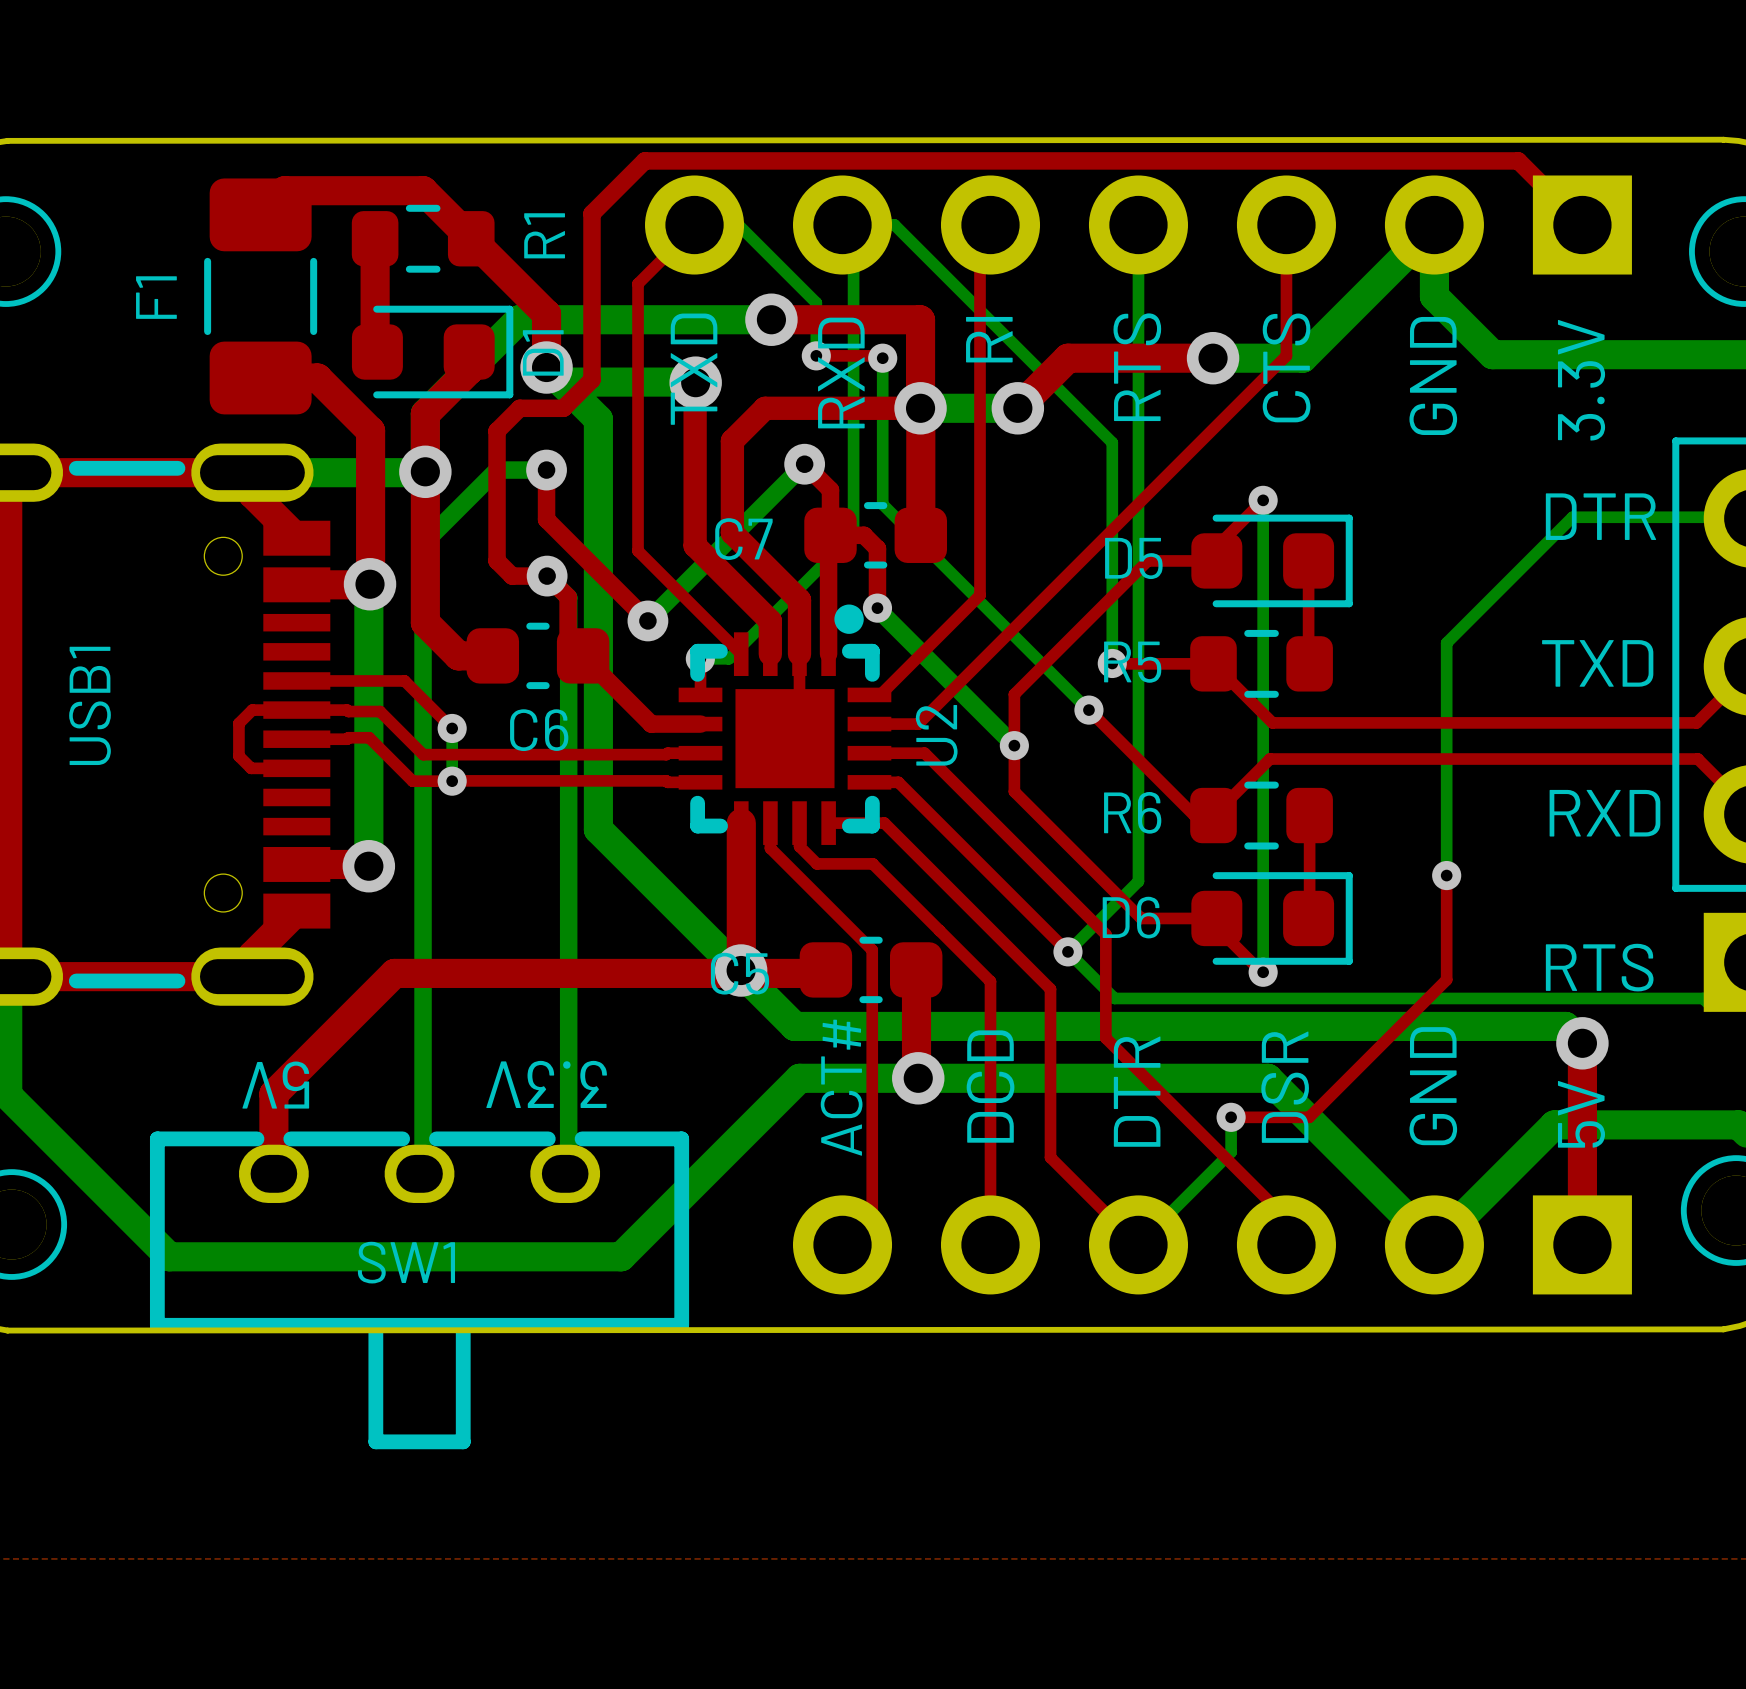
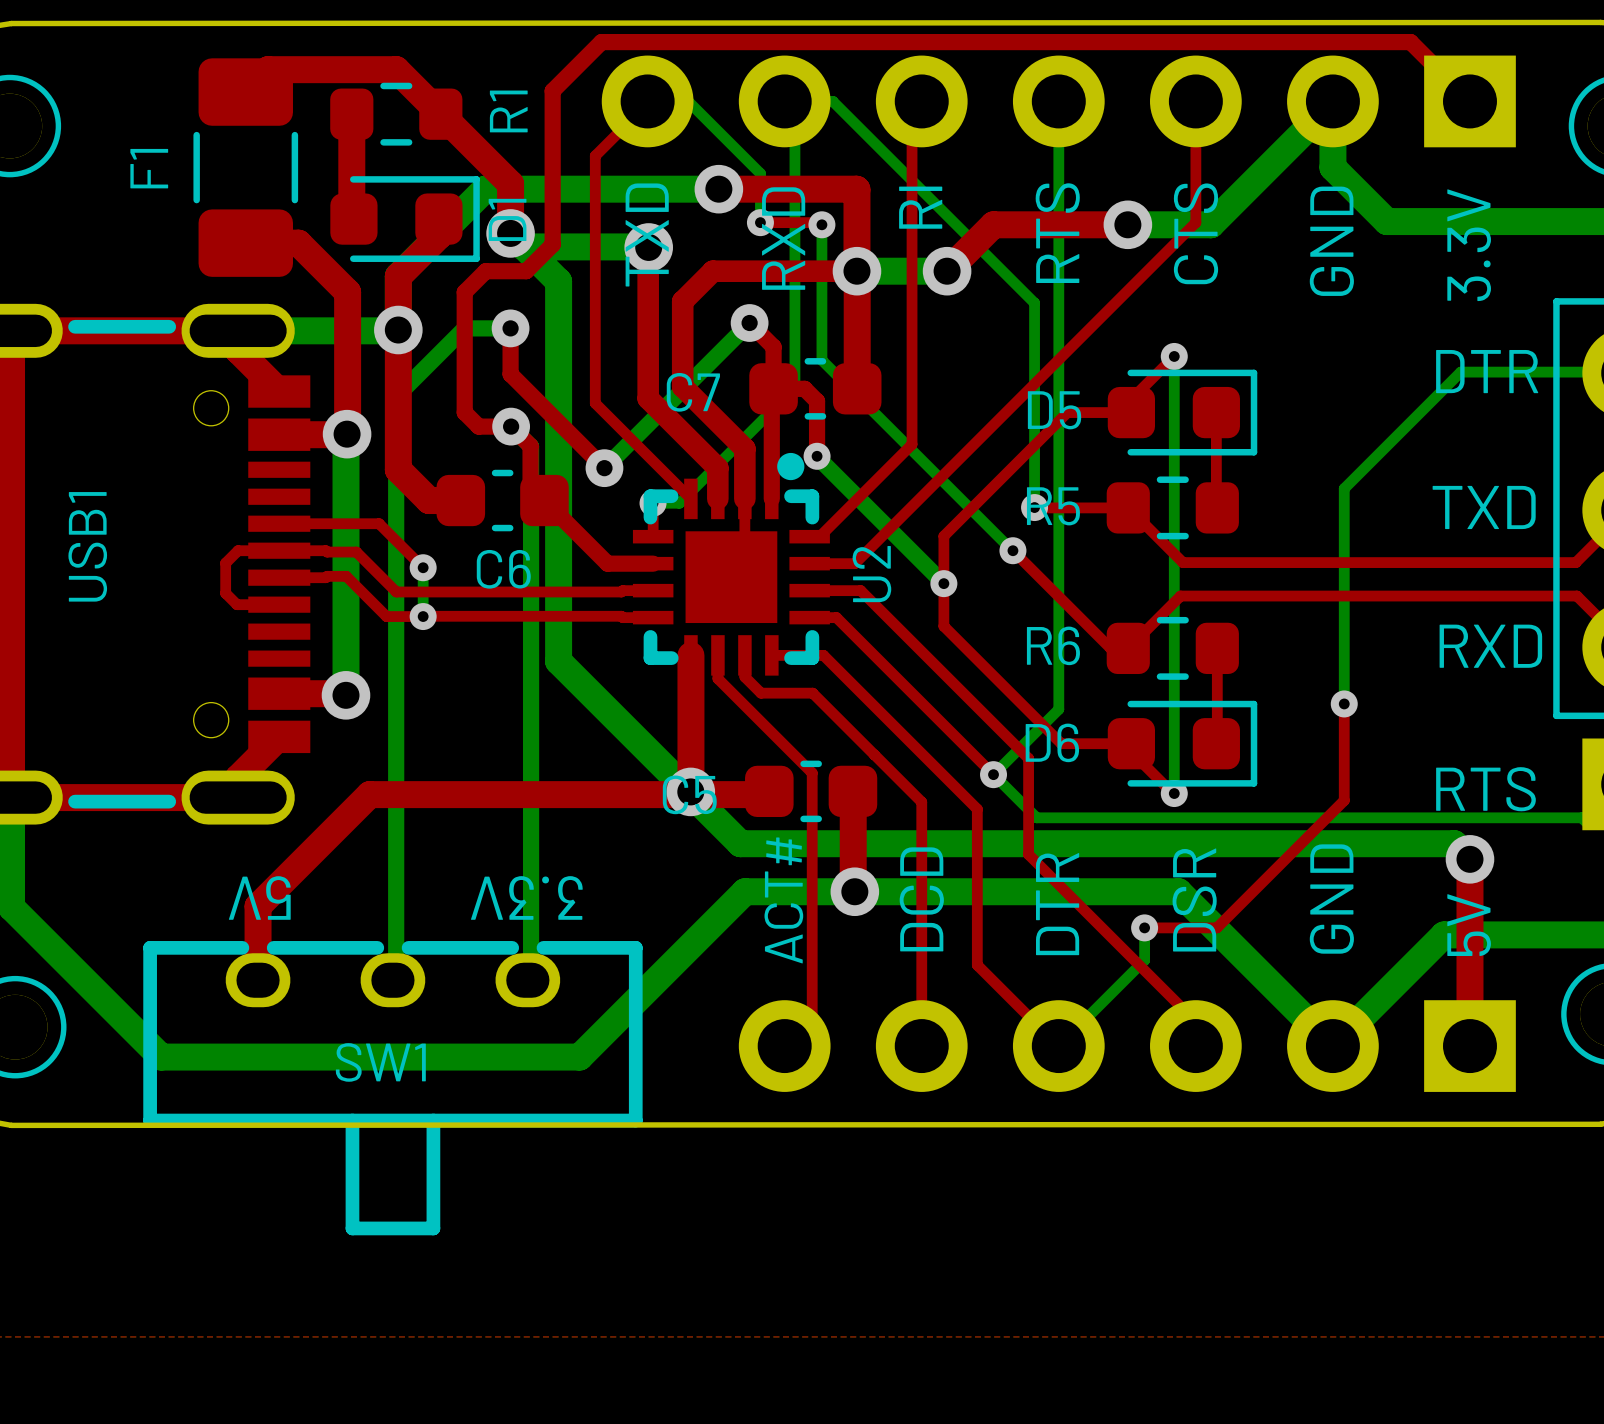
text position: 3.3V (546, 1084) -> 3.3V (526, 897)

